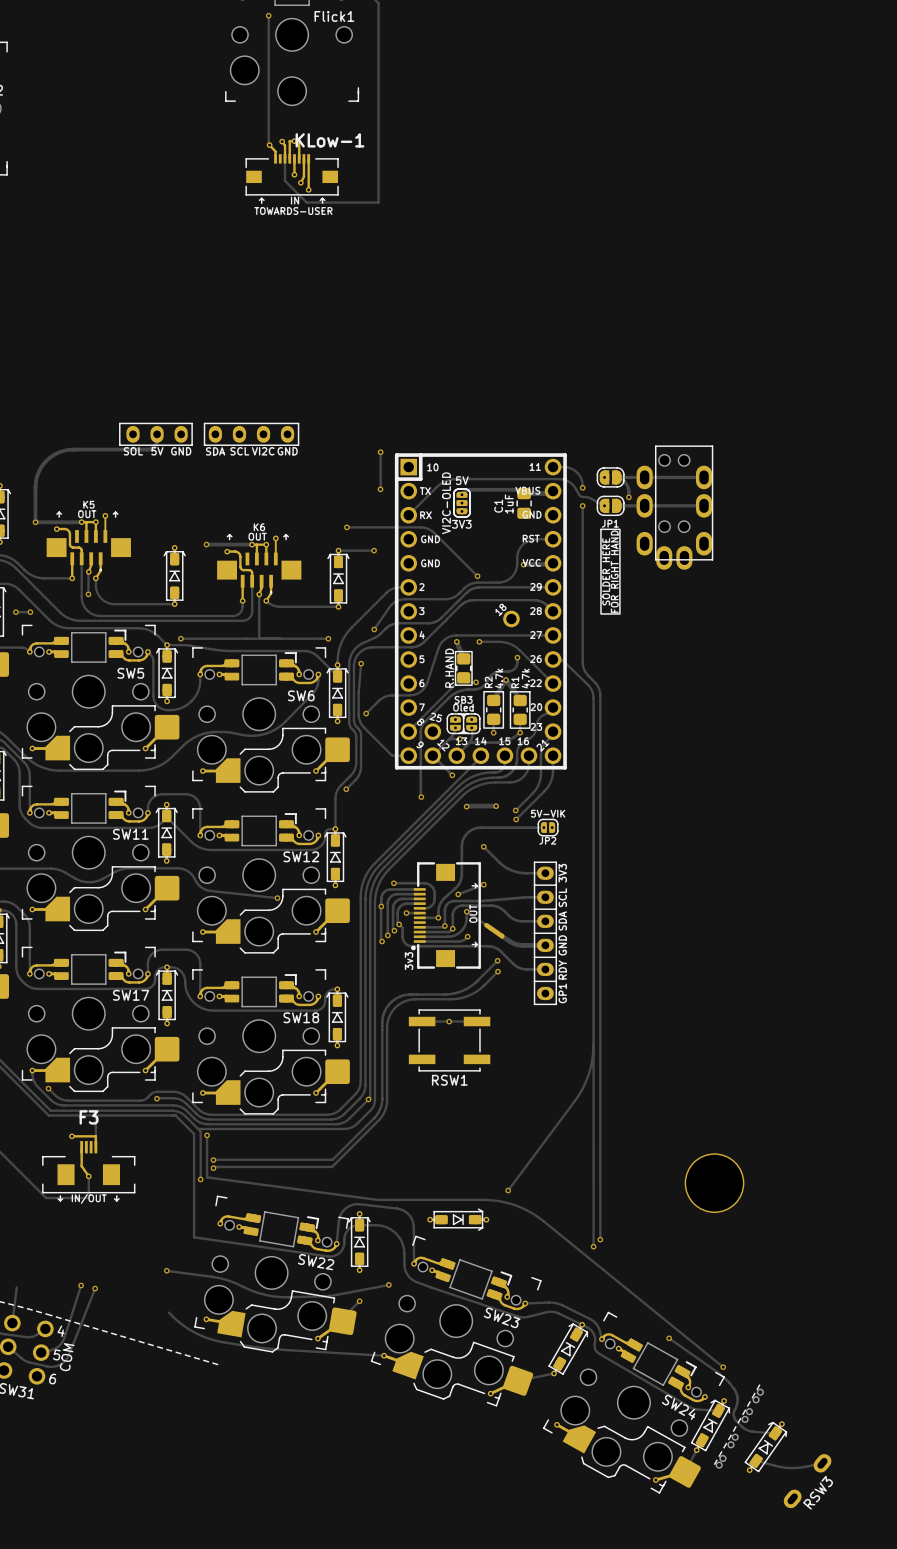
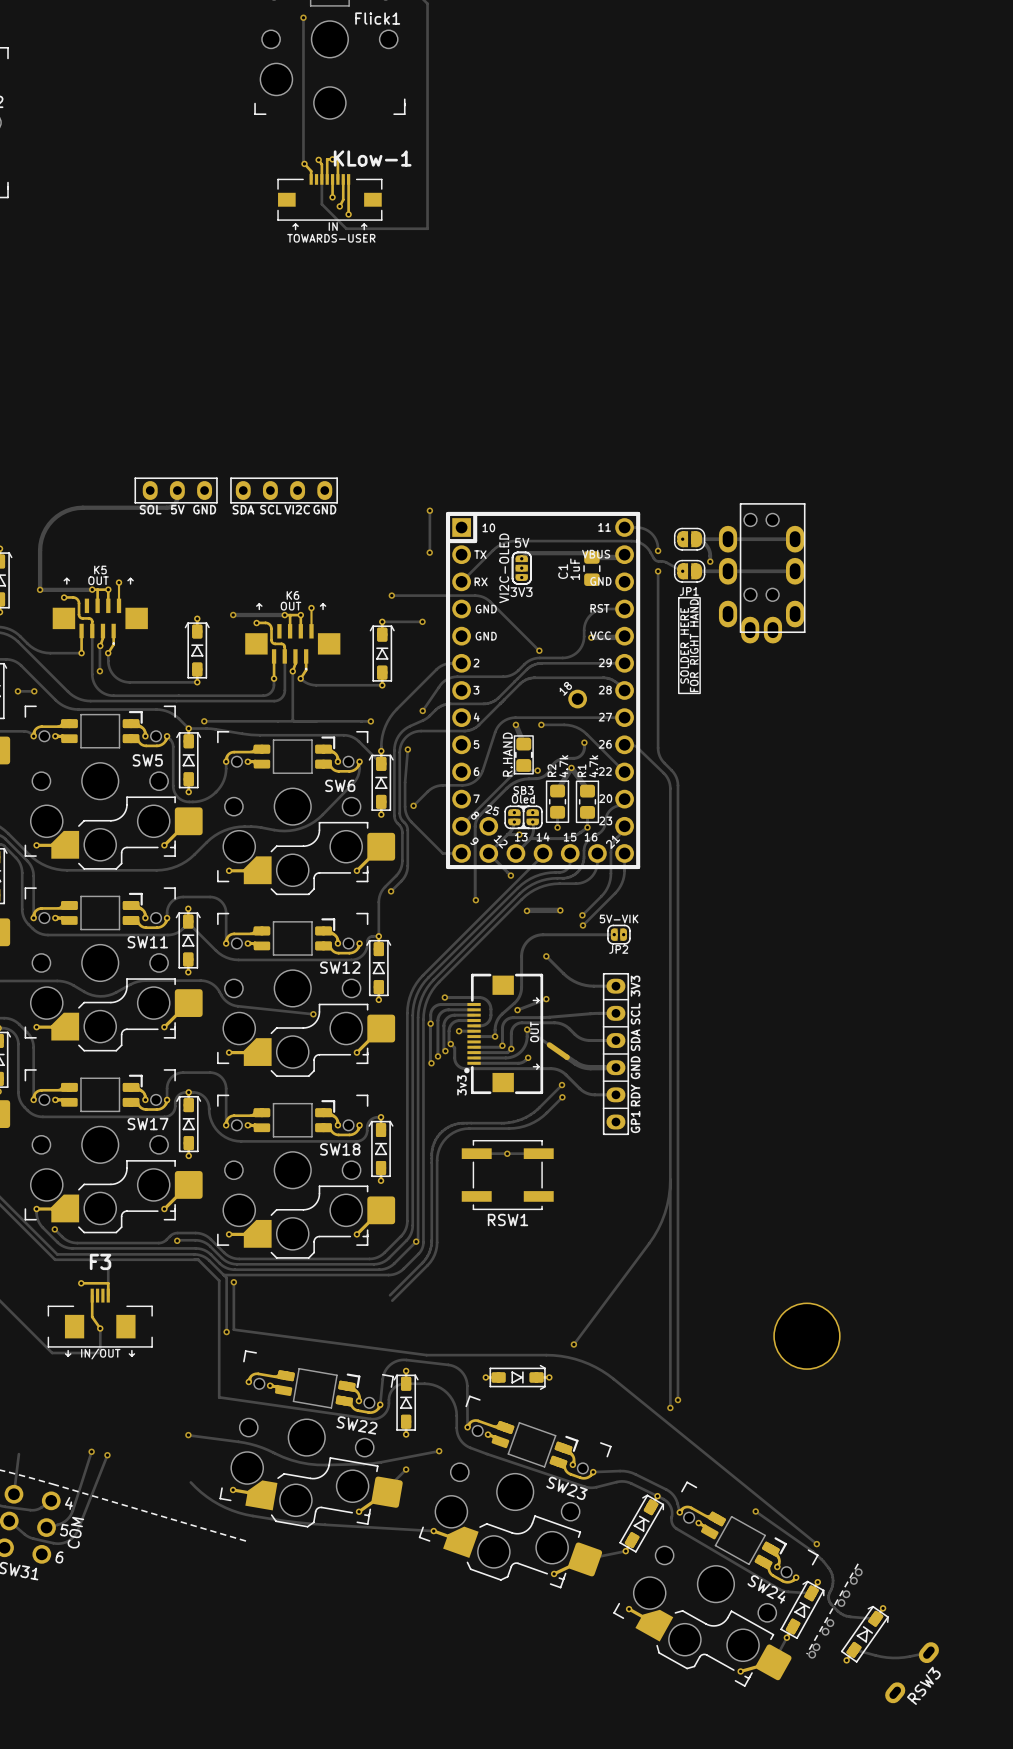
track: (345, 1146) (332, 1159) (213, 1160) -> none
track: (347, 1151) (332, 1166) (213, 1168) -> none
via: (213, 1160) -> none
via: (213, 1168) -> none

